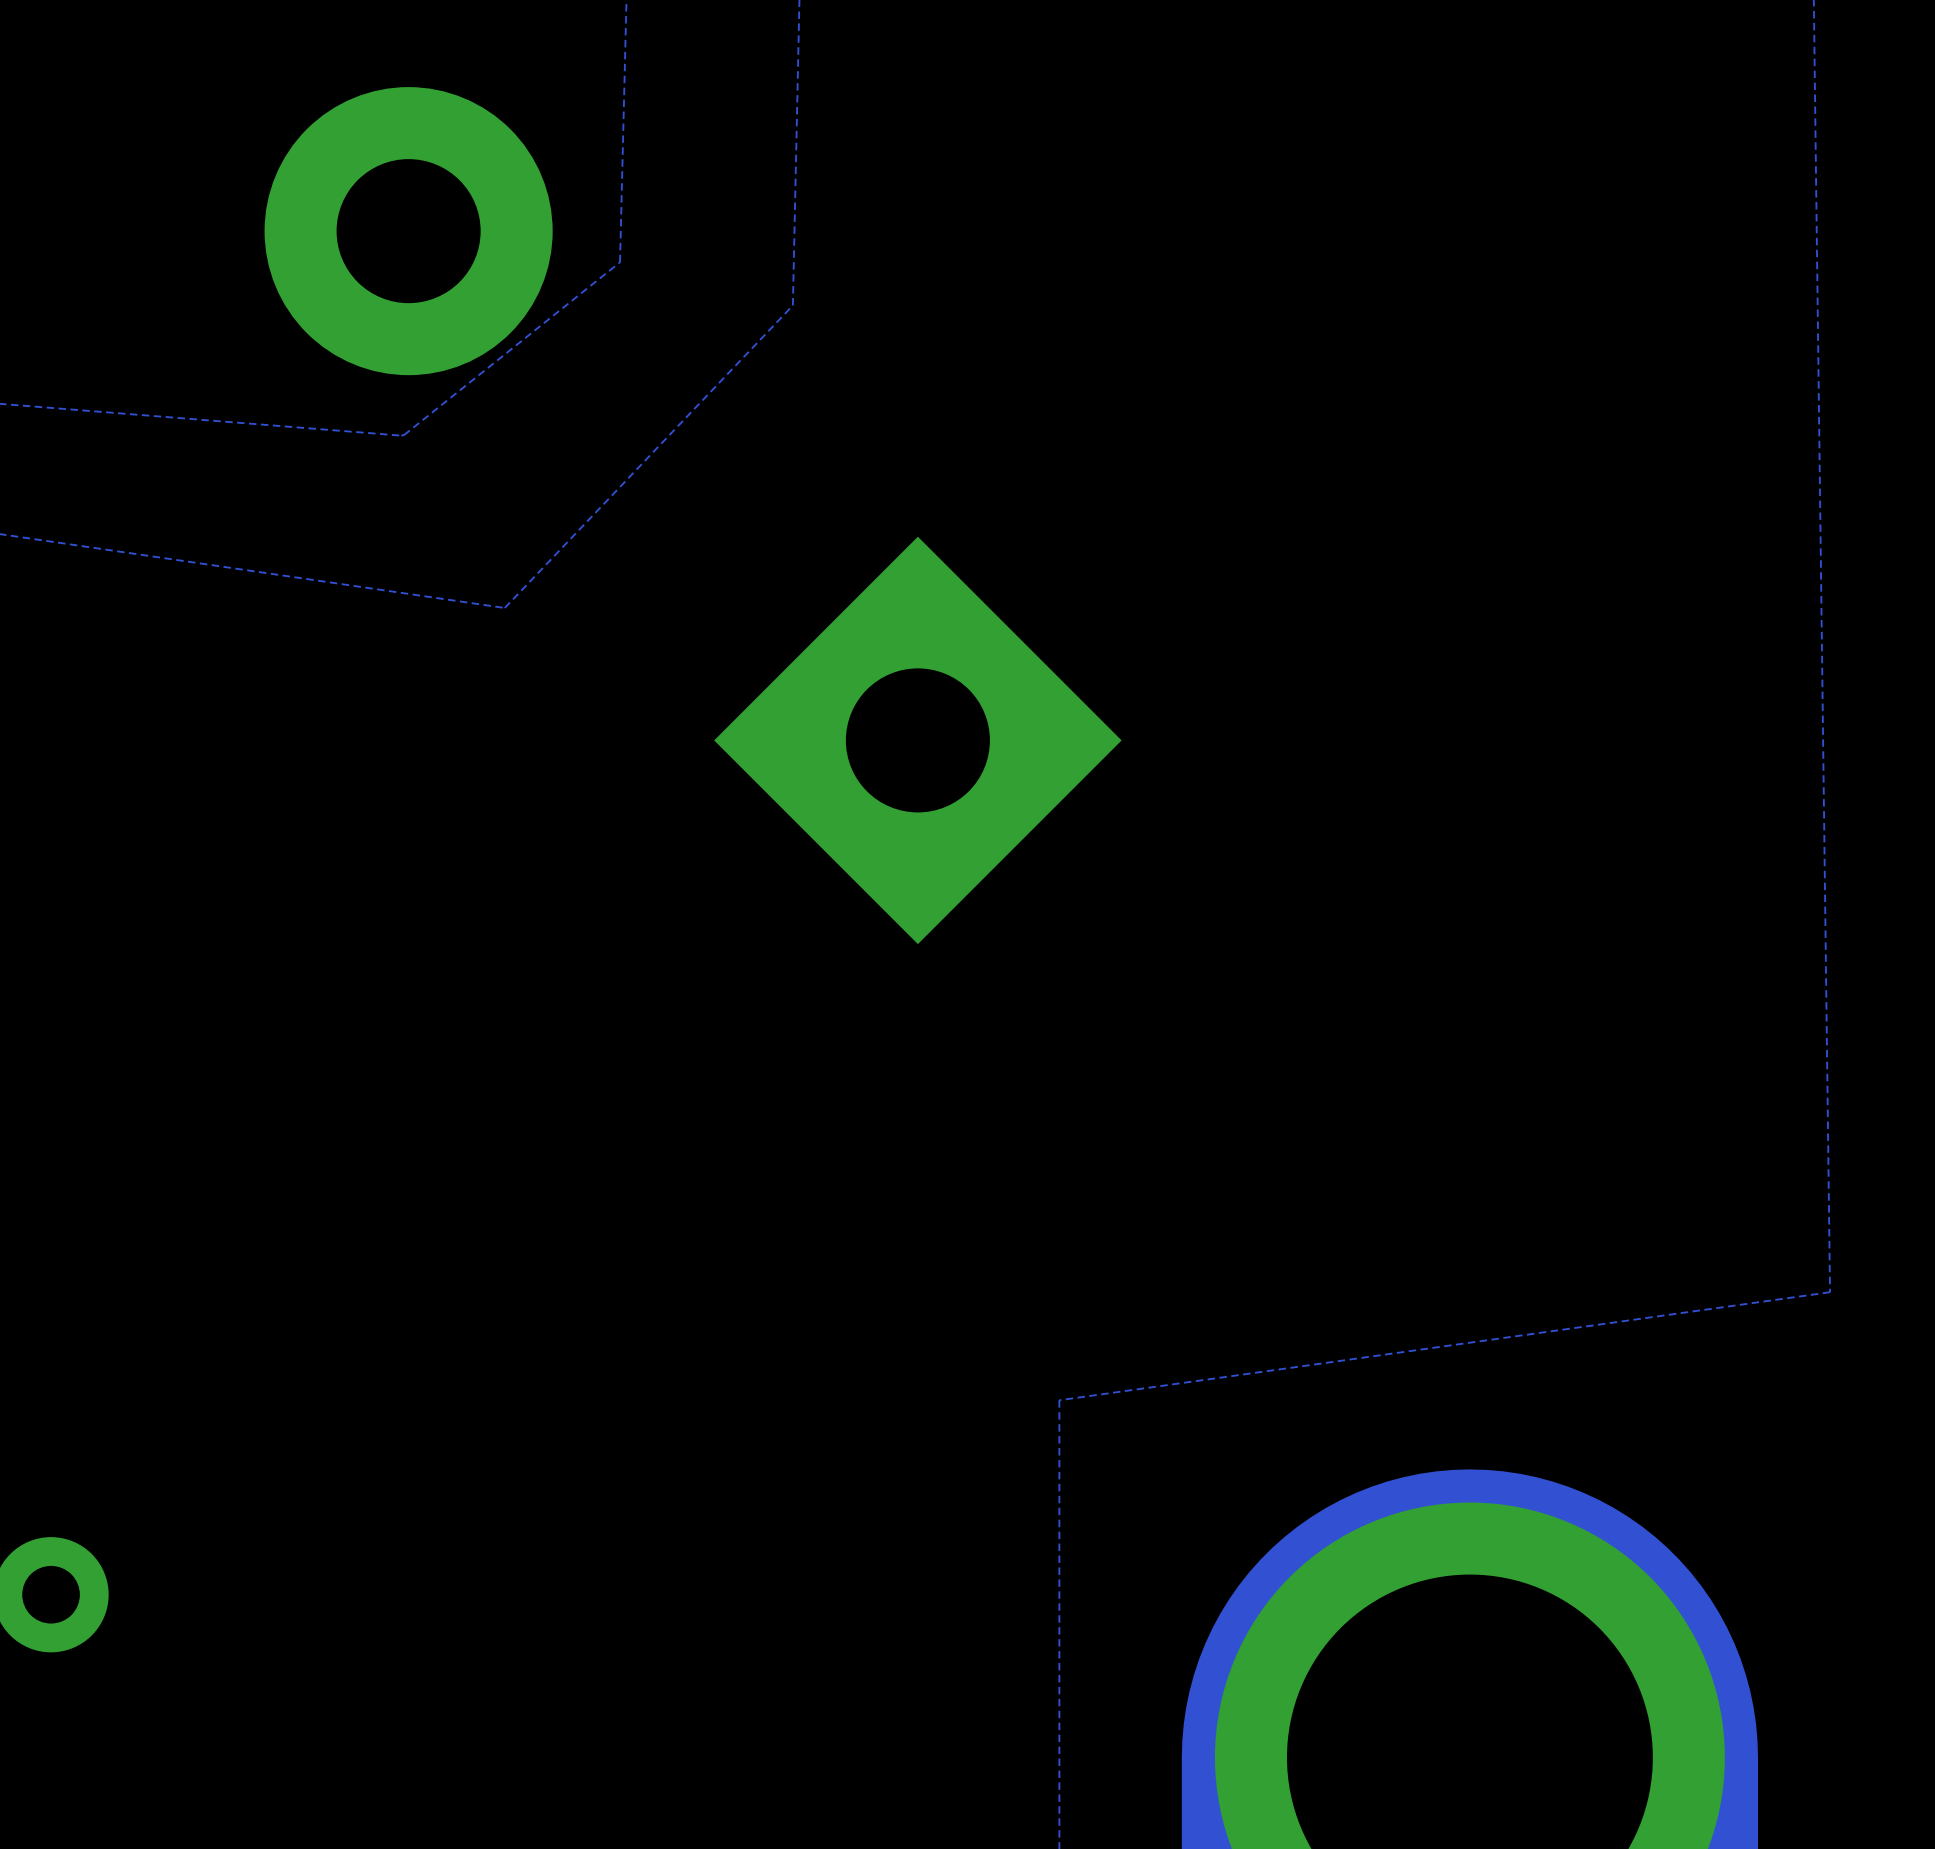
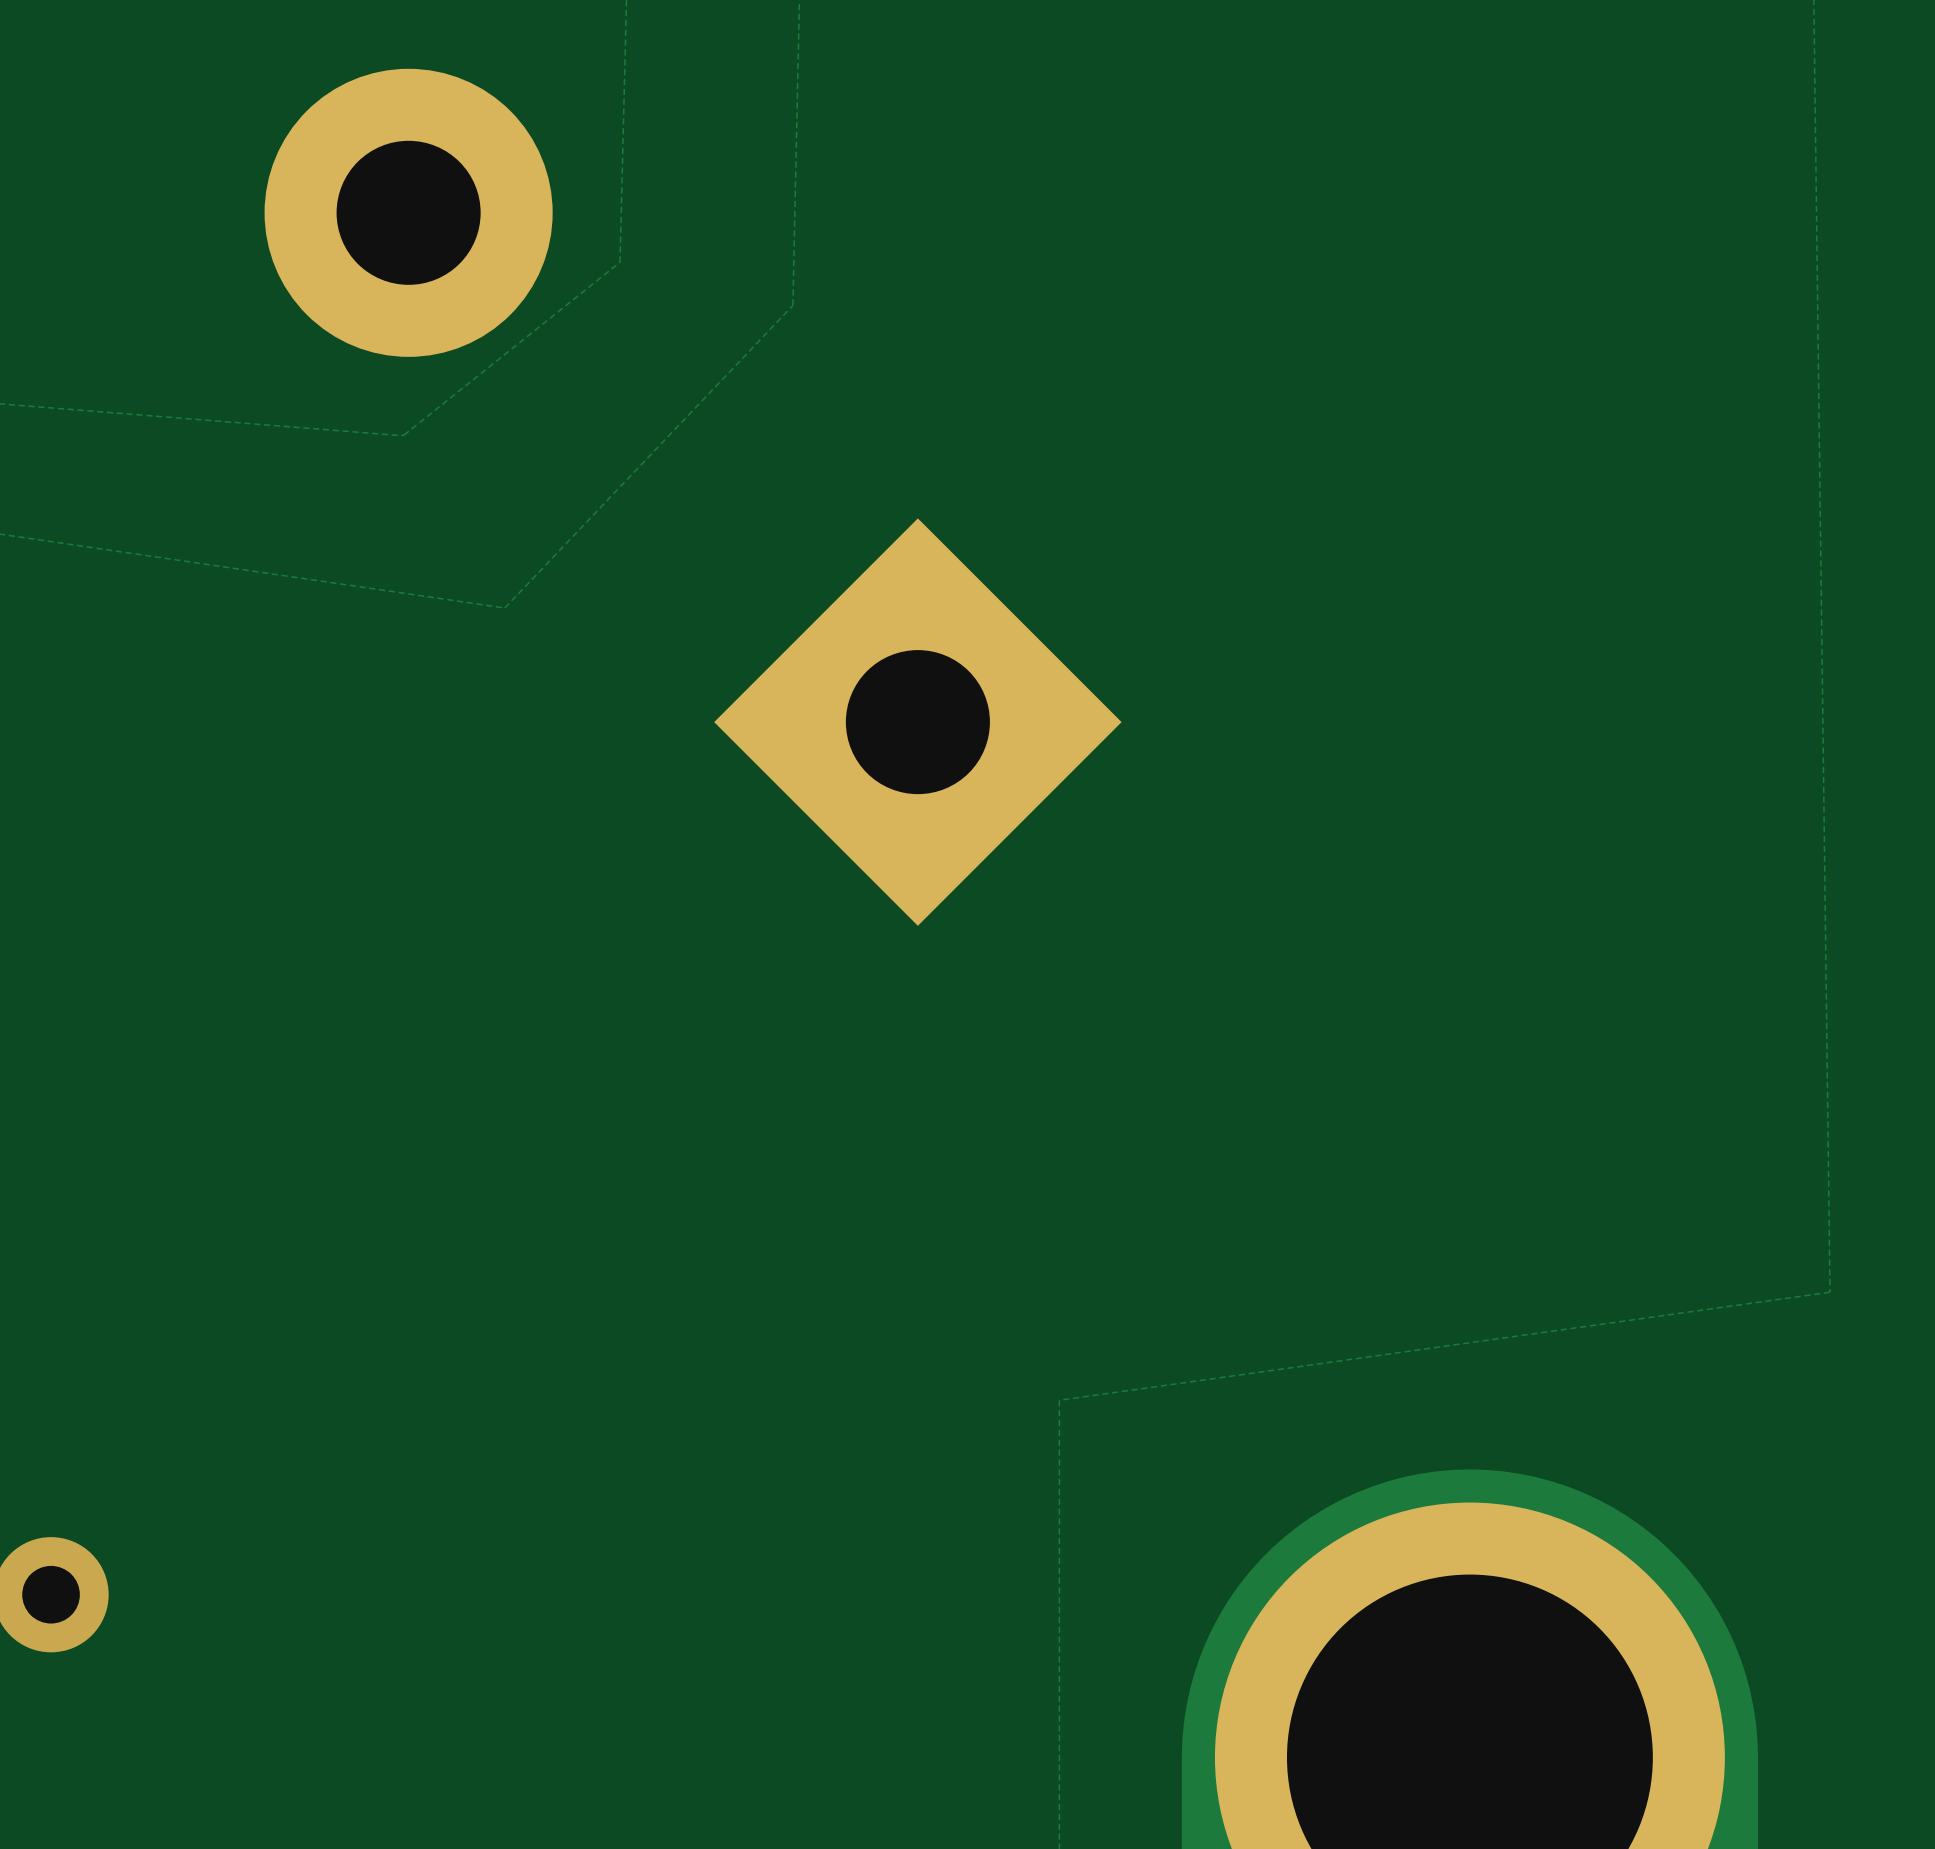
part position: (693, 515) -> (693, 497)

